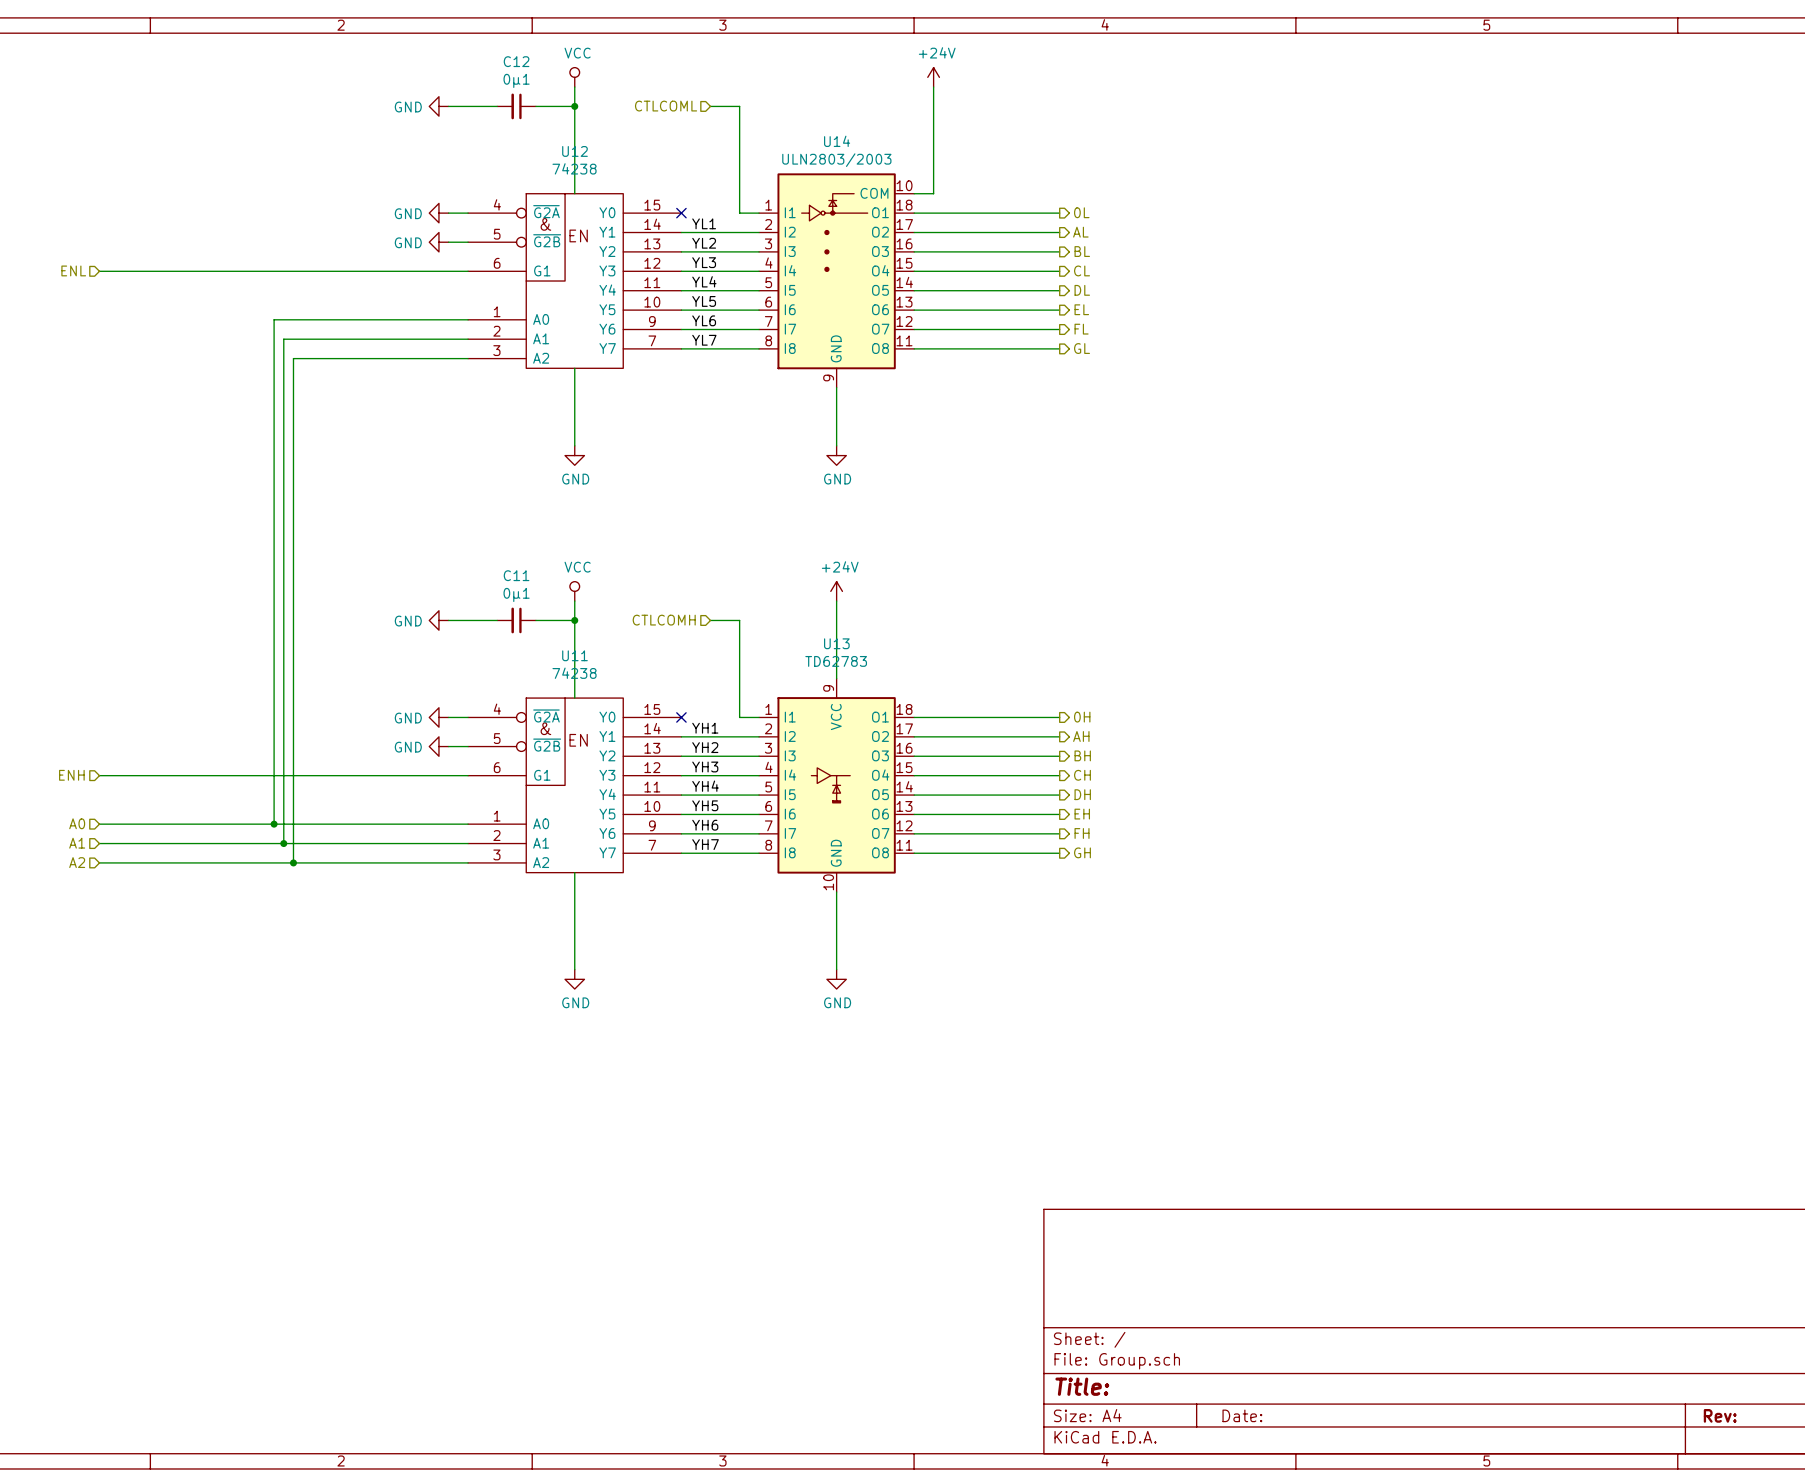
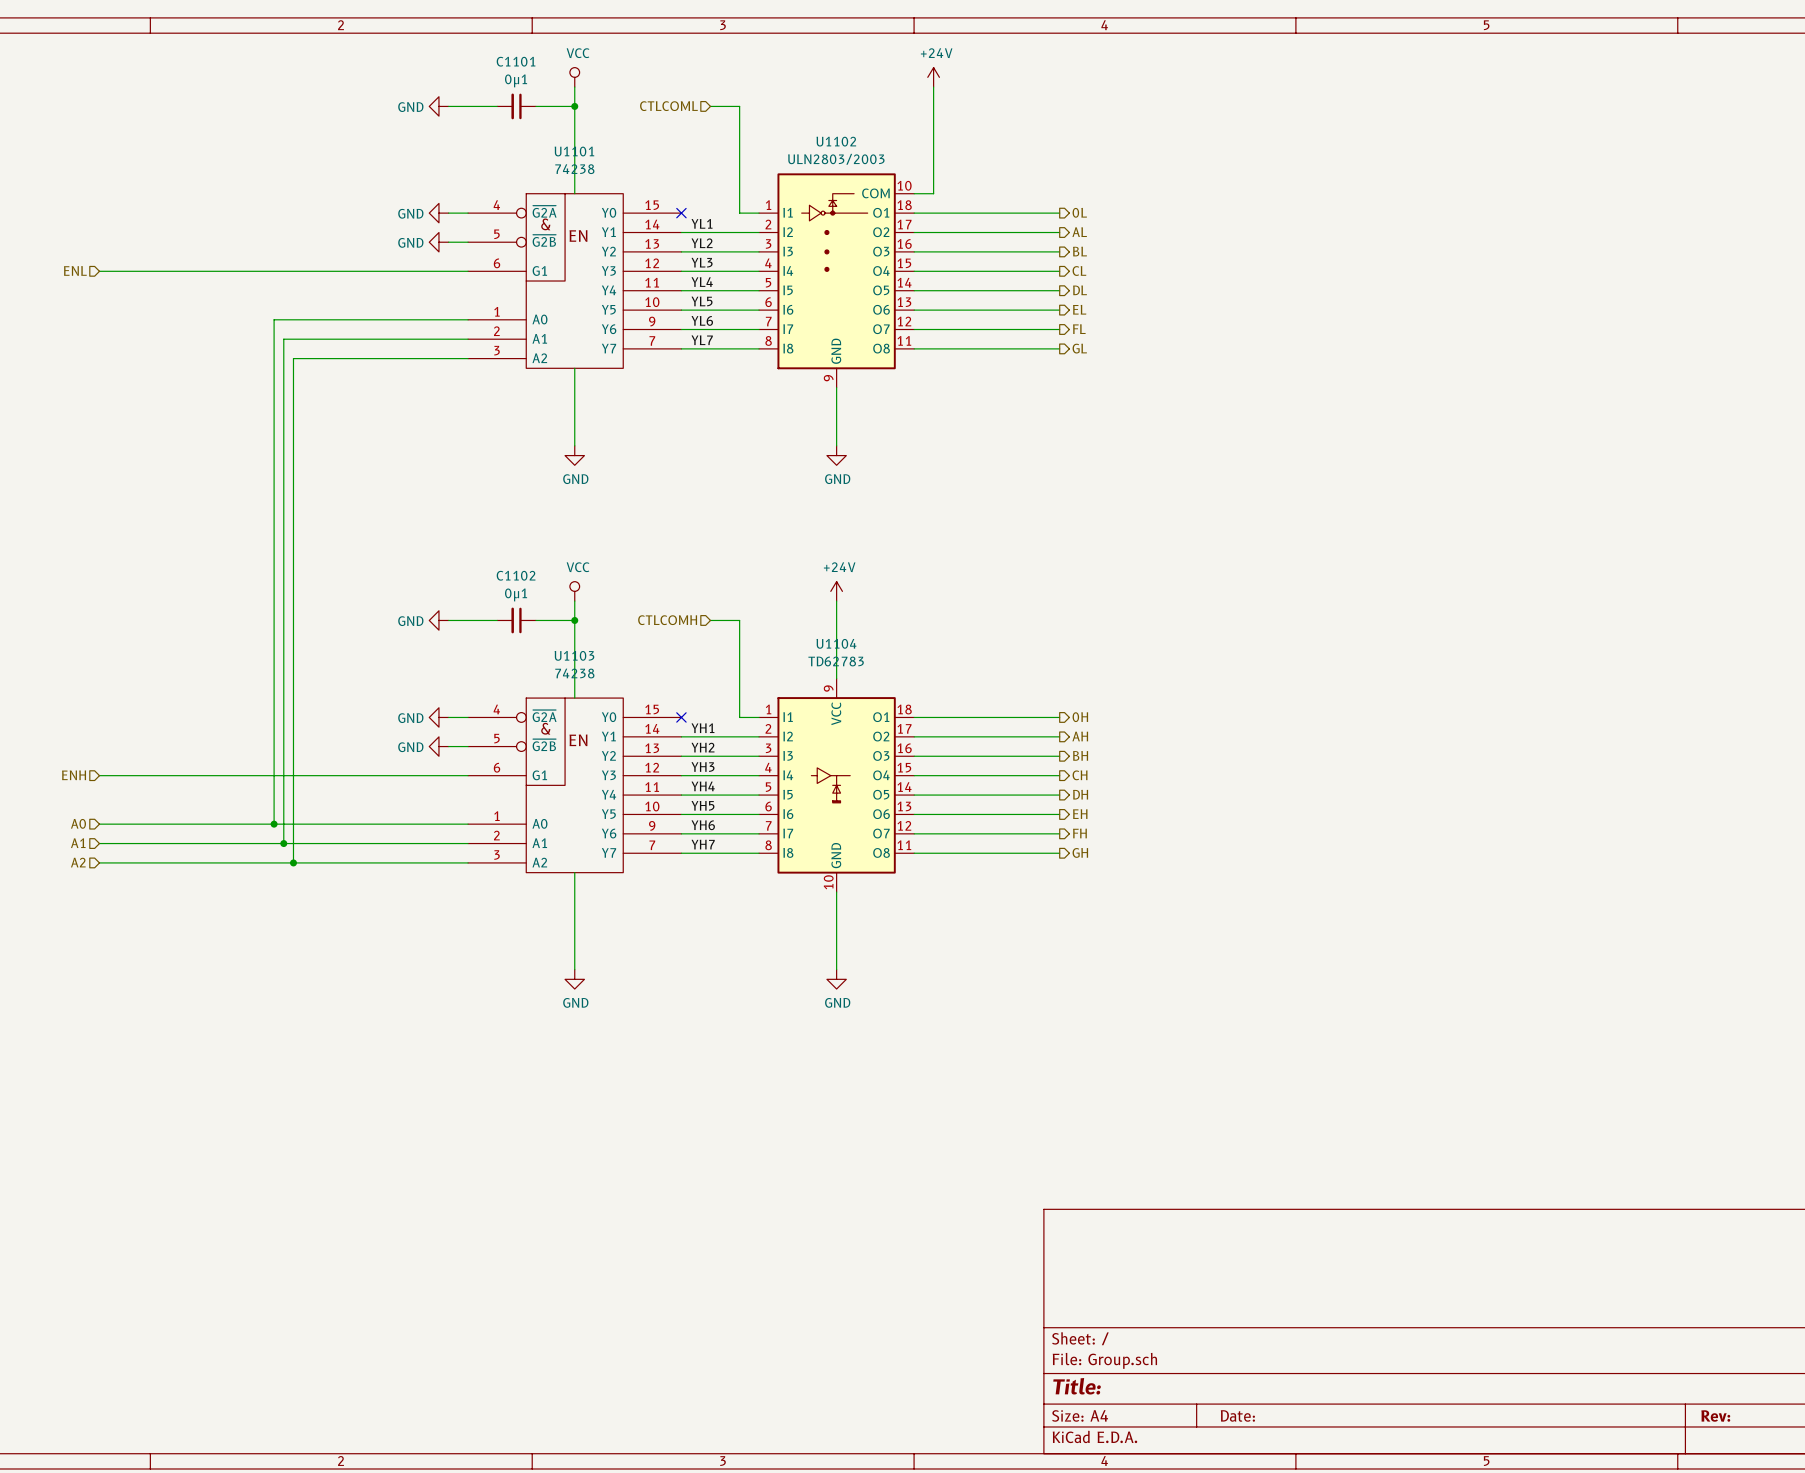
C12 name: C12 (516, 61) -> C1101 (516, 61)
U14 name: U14 (837, 141) -> U1102 (836, 141)
U12 name: U12 (574, 151) -> U1101 (574, 151)
C11 name: C11 (516, 575) -> C1102 (516, 575)
U13 name: U13 (836, 643) -> U1104 (836, 643)
U11 name: U11 (574, 655) -> U1103 (574, 655)

